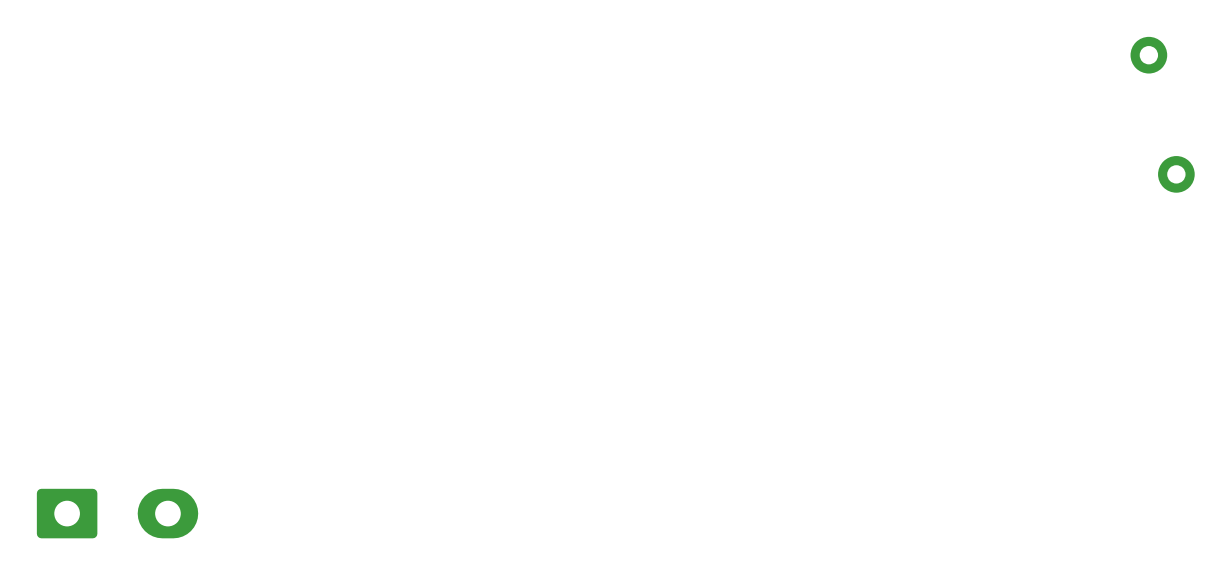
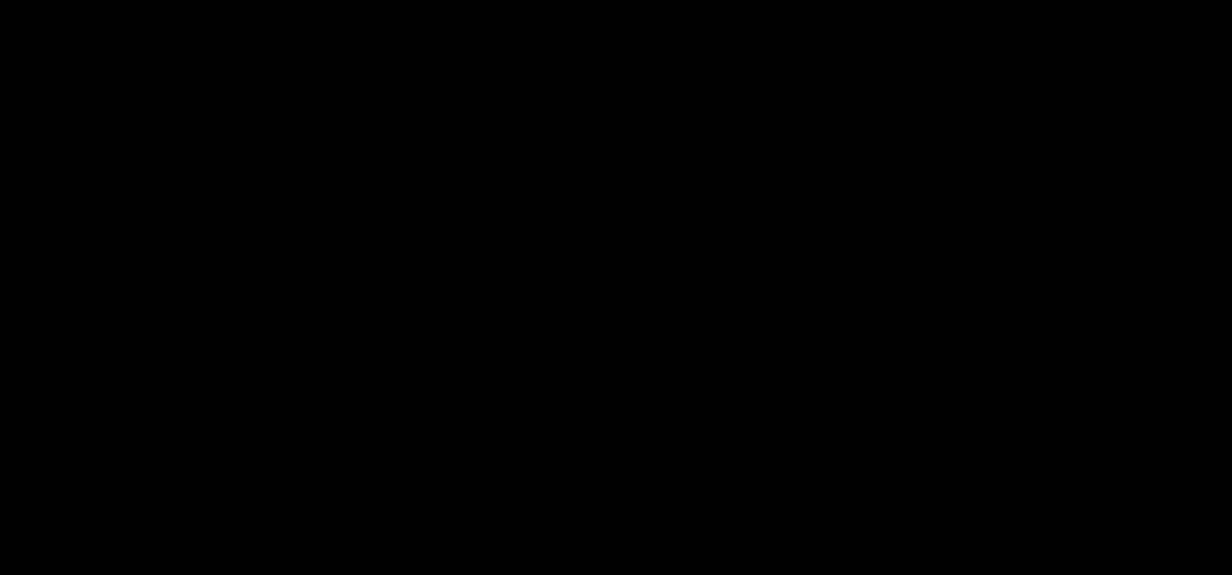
part: (1148, 55) -> none
part: (1176, 174) -> none
part: (117, 513) -> none

